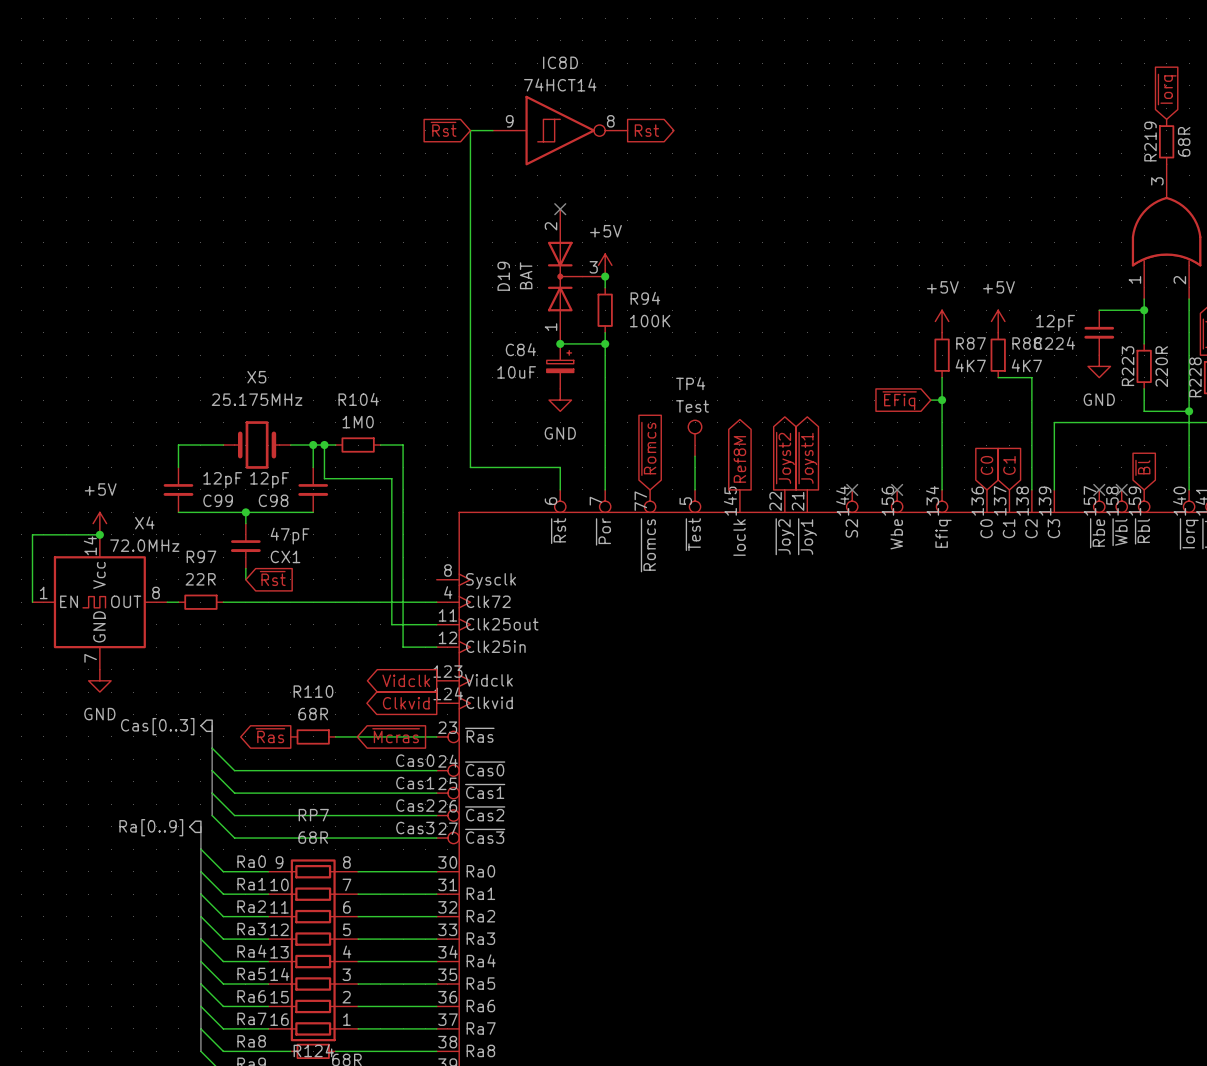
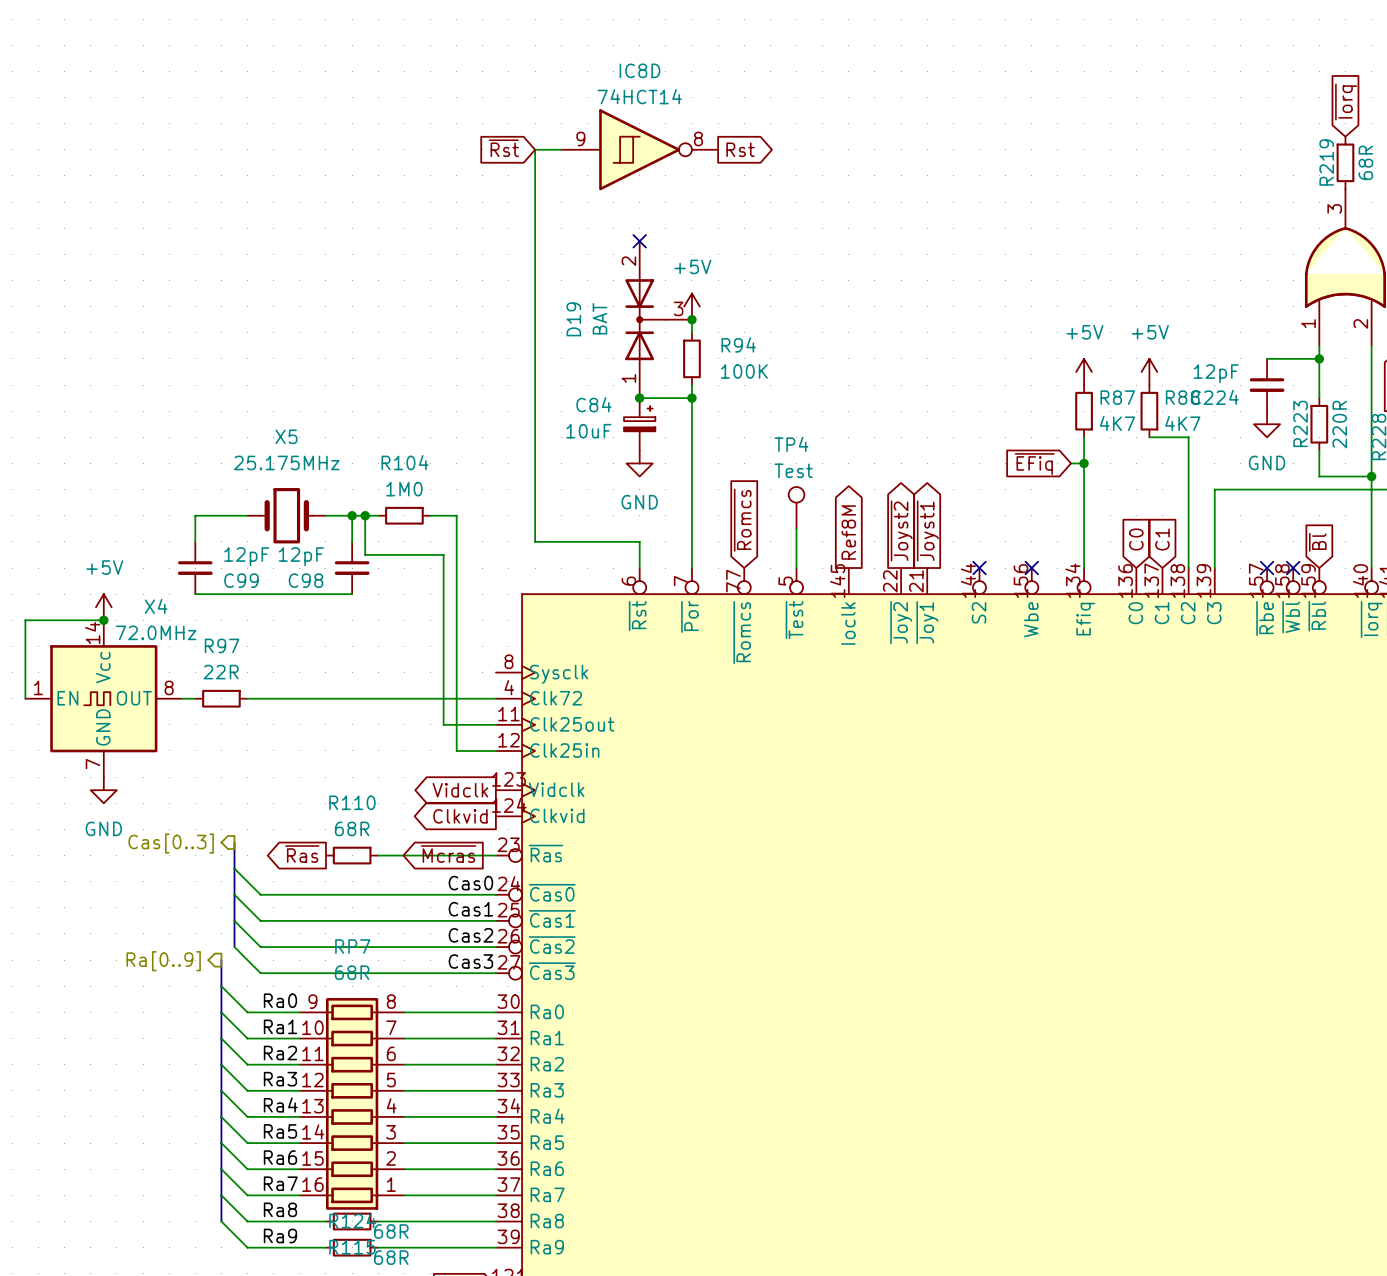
wire: (245, 512) (245, 523) -> none
junction: (245, 512) -> none
CX1: 47pF (245, 546) -> none
wire: (245, 568) (245, 579) -> none
global label: ~{Rst} (272, 578) -> none

